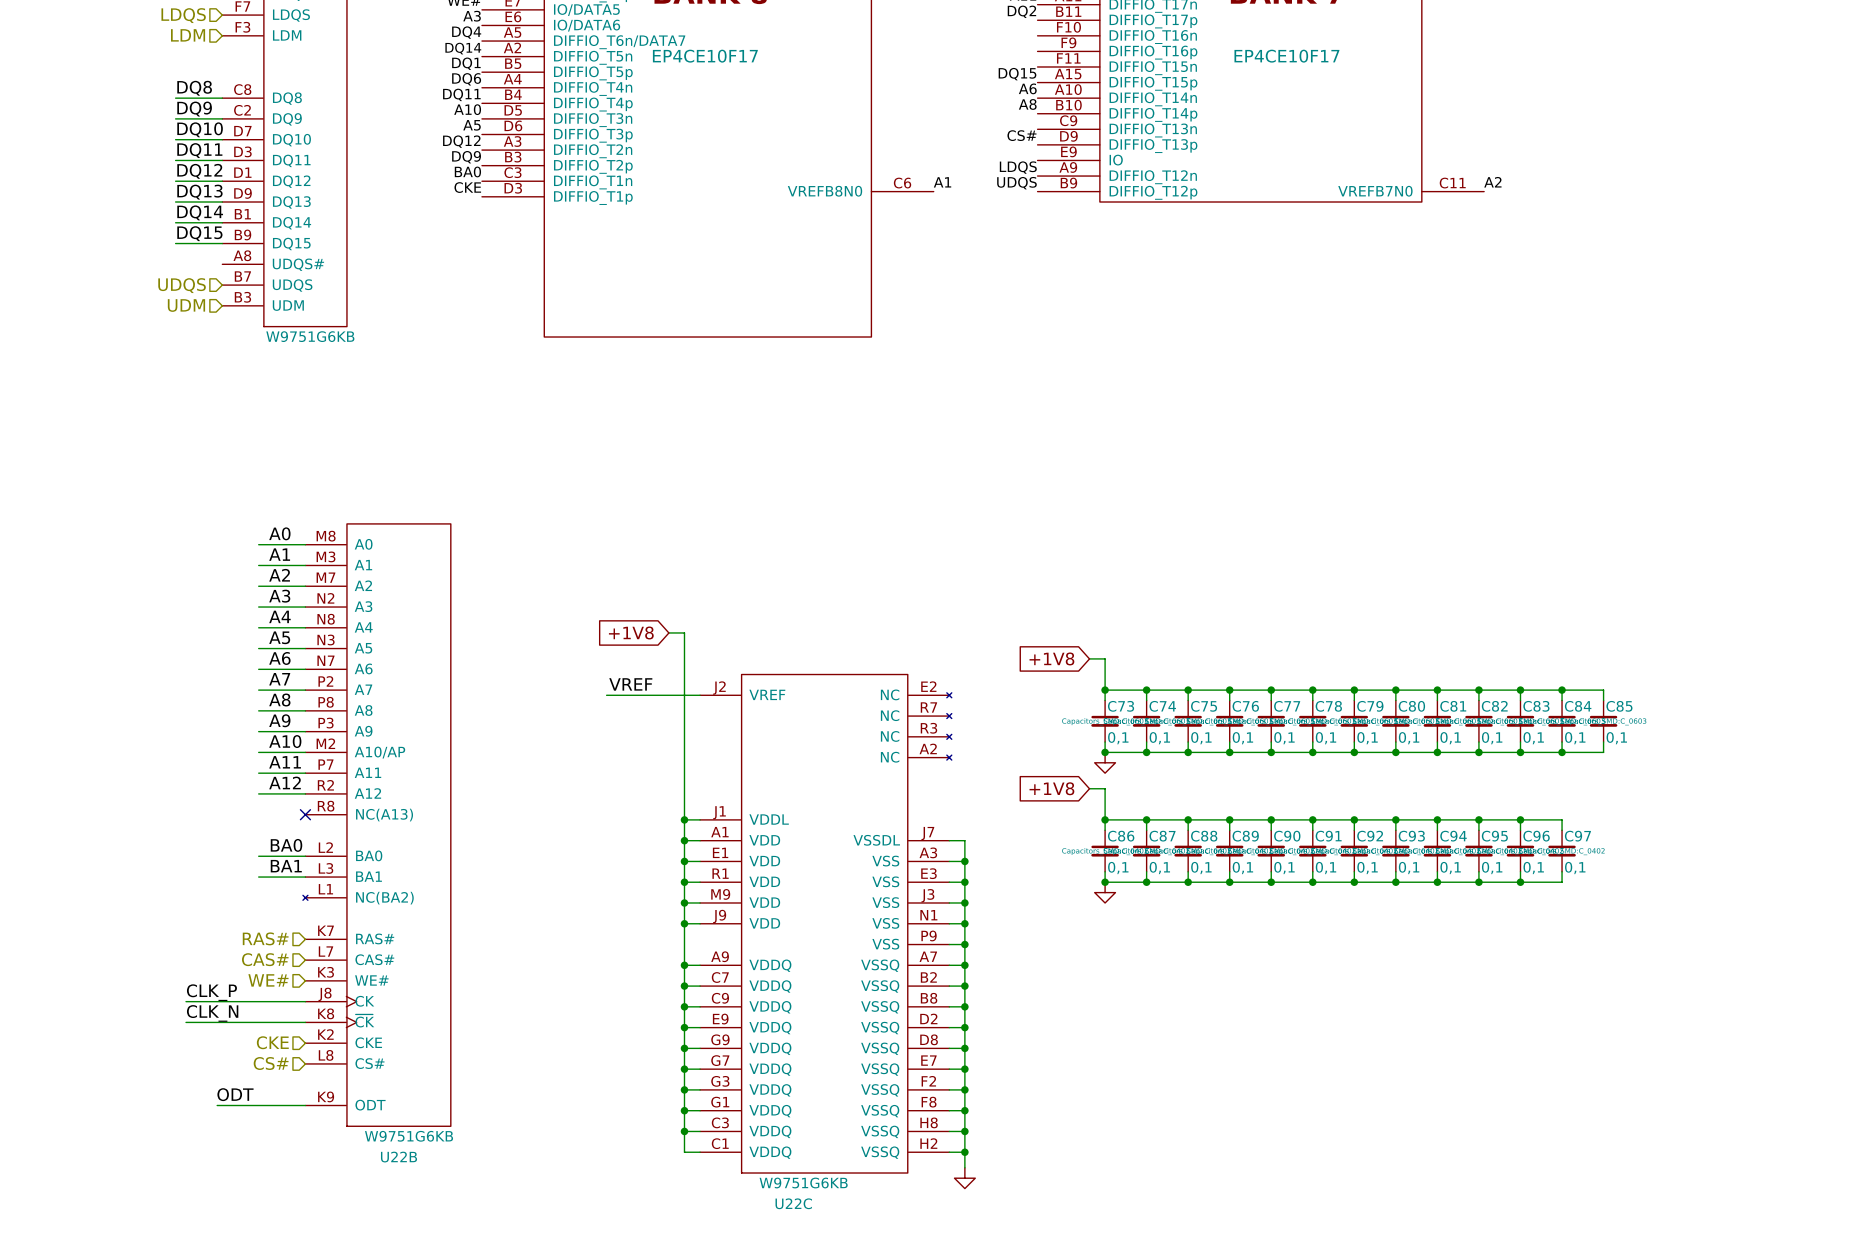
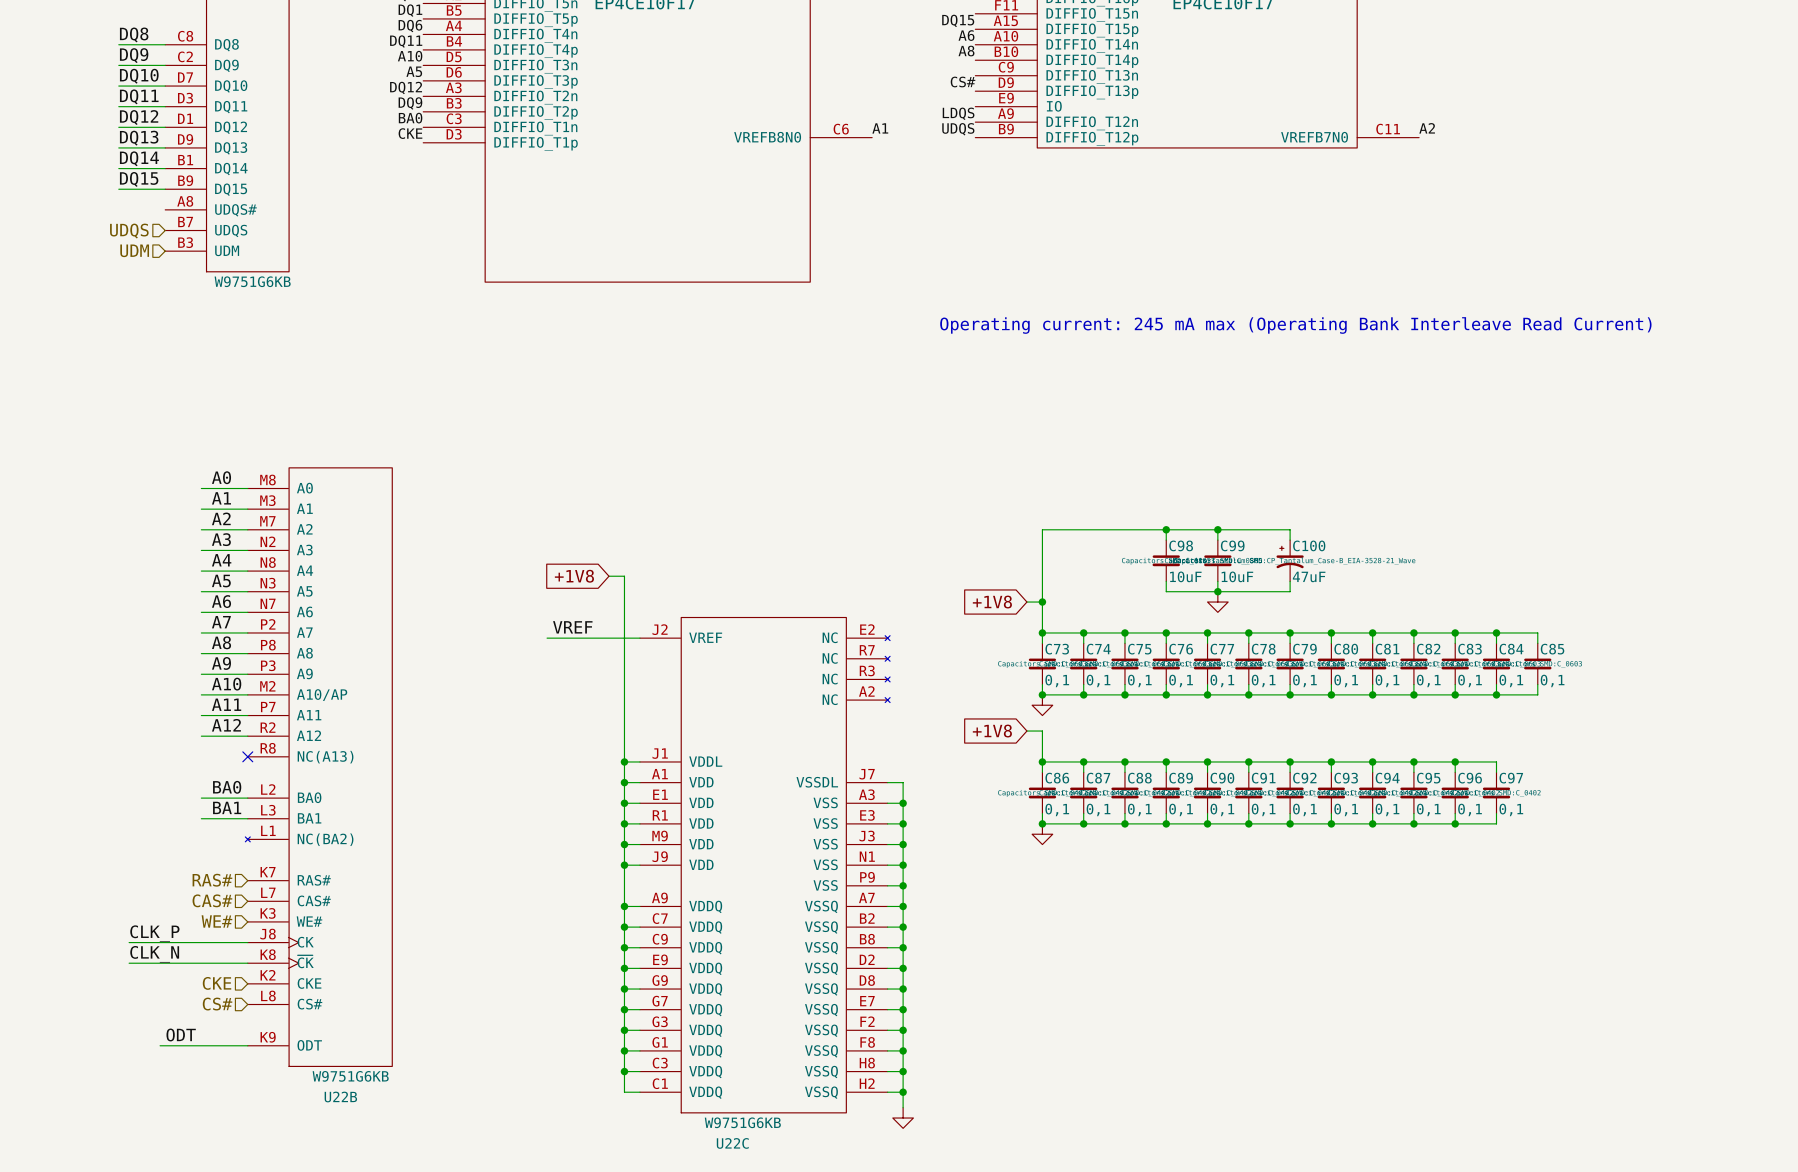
text: none -> Operating current: 245 mA max (Operating Bank Interleave Read Current) (1295, 325)
wire: none -> (1166, 529) (1166, 540)
junction: none -> (1166, 529)
wire: none -> (1217, 529) (1217, 540)
junction: none -> (1217, 529)
wire: none -> (1290, 540) (1290, 529) (1042, 529) (1042, 602)
C98: none -> 10uF (1166, 560)
C99: none -> 10uF (1217, 560)
C100: none -> 47uF (1290, 560)
wire: none -> (1166, 581) (1166, 591) (1290, 591) (1290, 581)
wire: none -> (1217, 581) (1217, 591)
junction: none -> (1217, 591)
junction: none -> (1042, 602)
power symbol: none -> (1217, 602)

